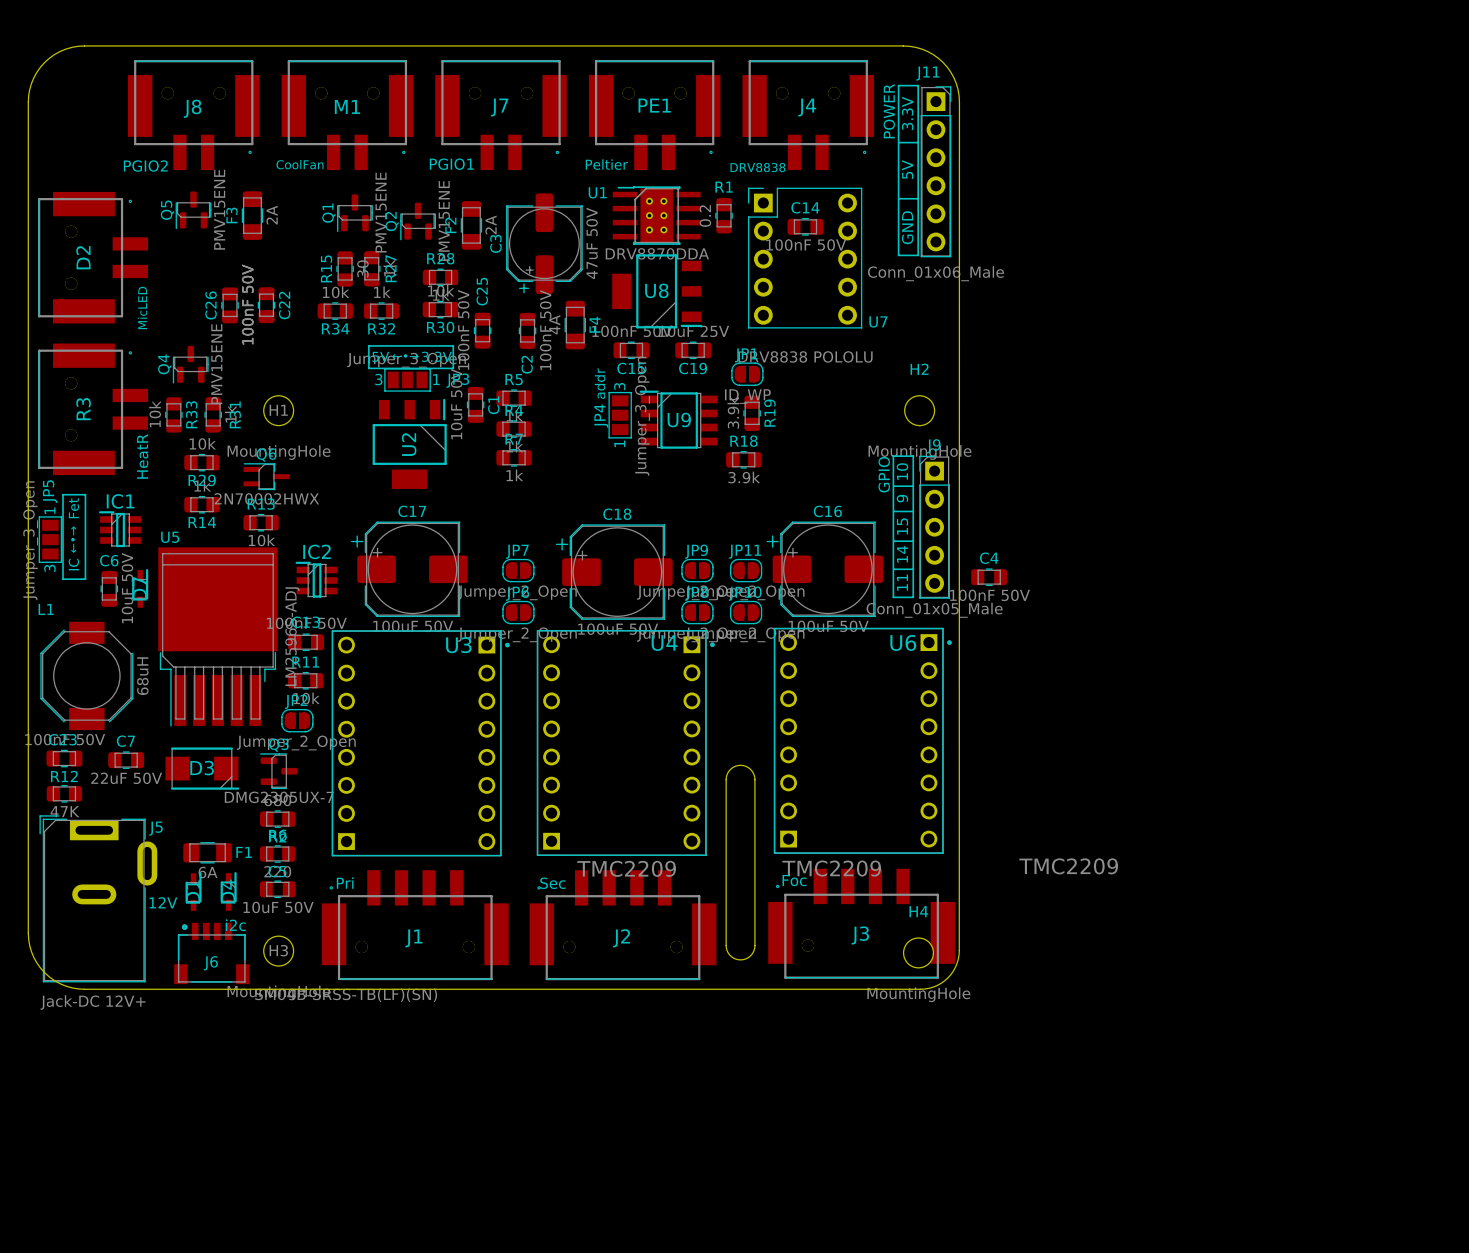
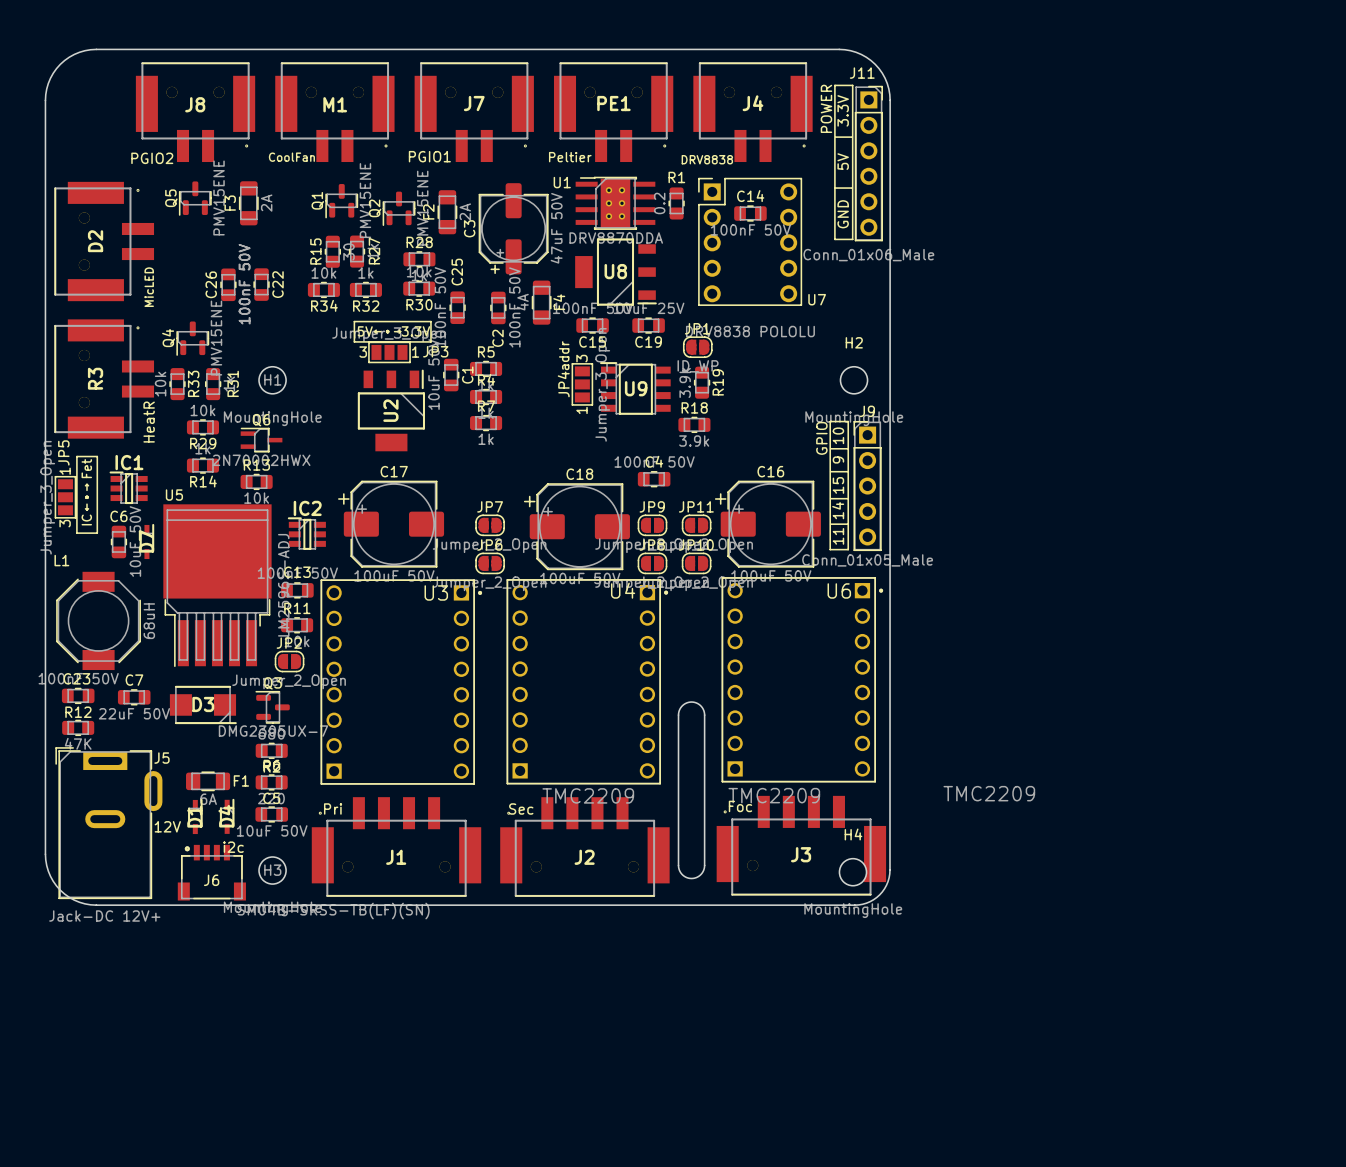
C4 position: (989, 577) -> (654, 479)
C4 value position: 100nF 50V (990, 595) -> 100nF 50V (654, 461)

